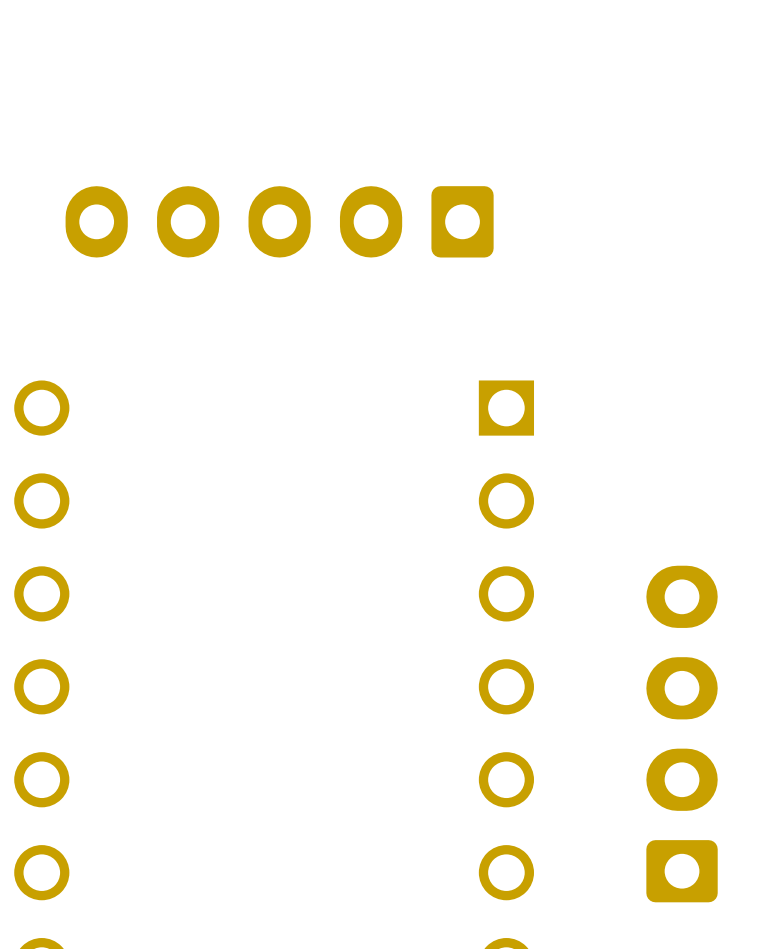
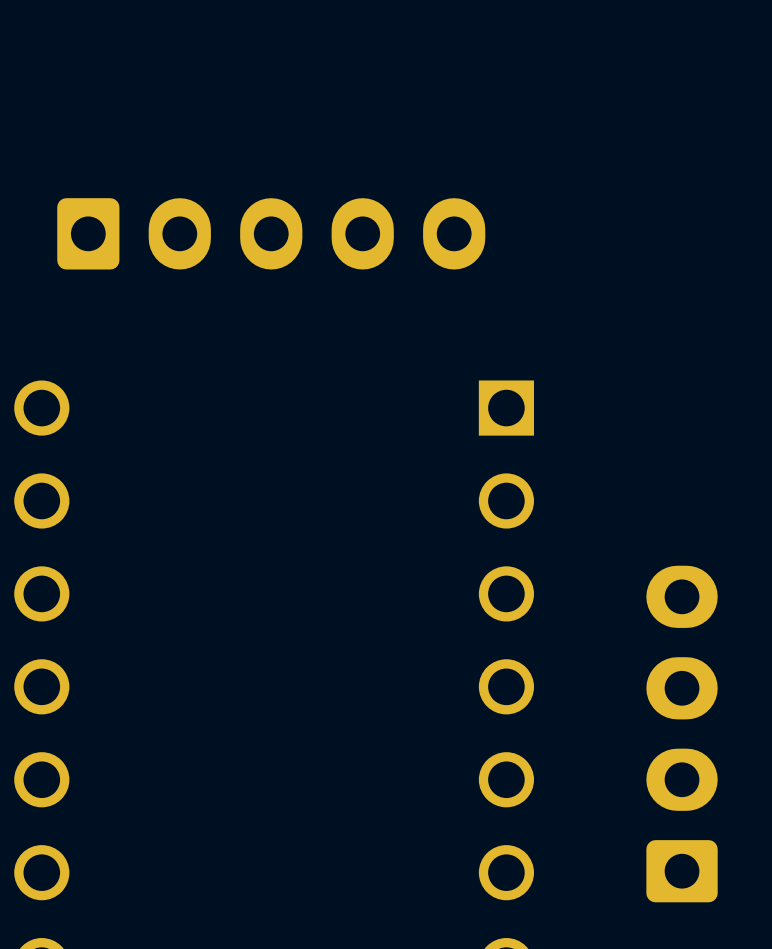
part rotation: 0° (279, 221) -> 180° (271, 233)

